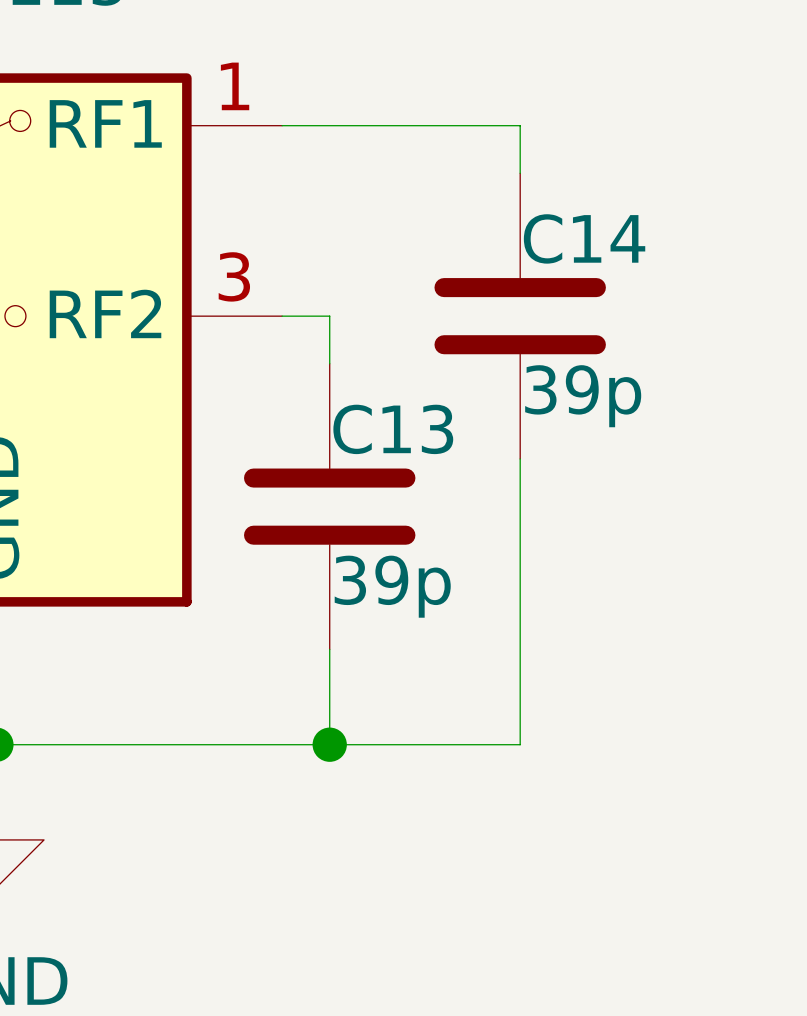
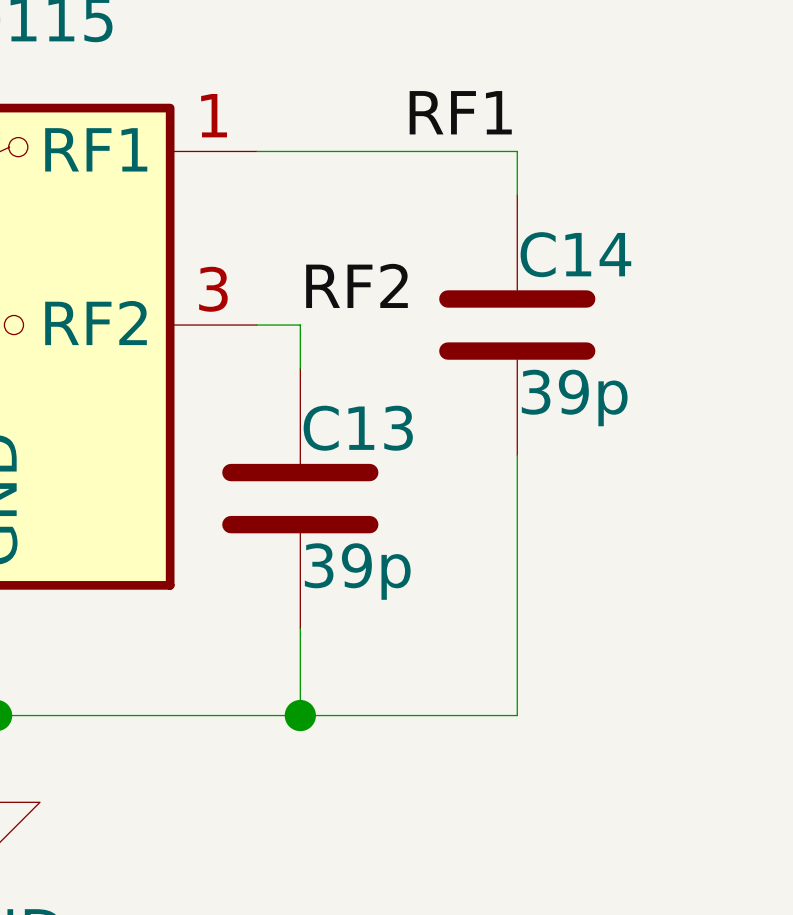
label: none -> RF1 (460, 112)
wire: (520, 125) (520, 173) -> (473, 151) (517, 151) (517, 194)
label: none -> RF2 (356, 285)
C14 position: (520, 316) -> (517, 325)
wire: (520, 459) (520, 744) -> (517, 455) (517, 715) (473, 715)

